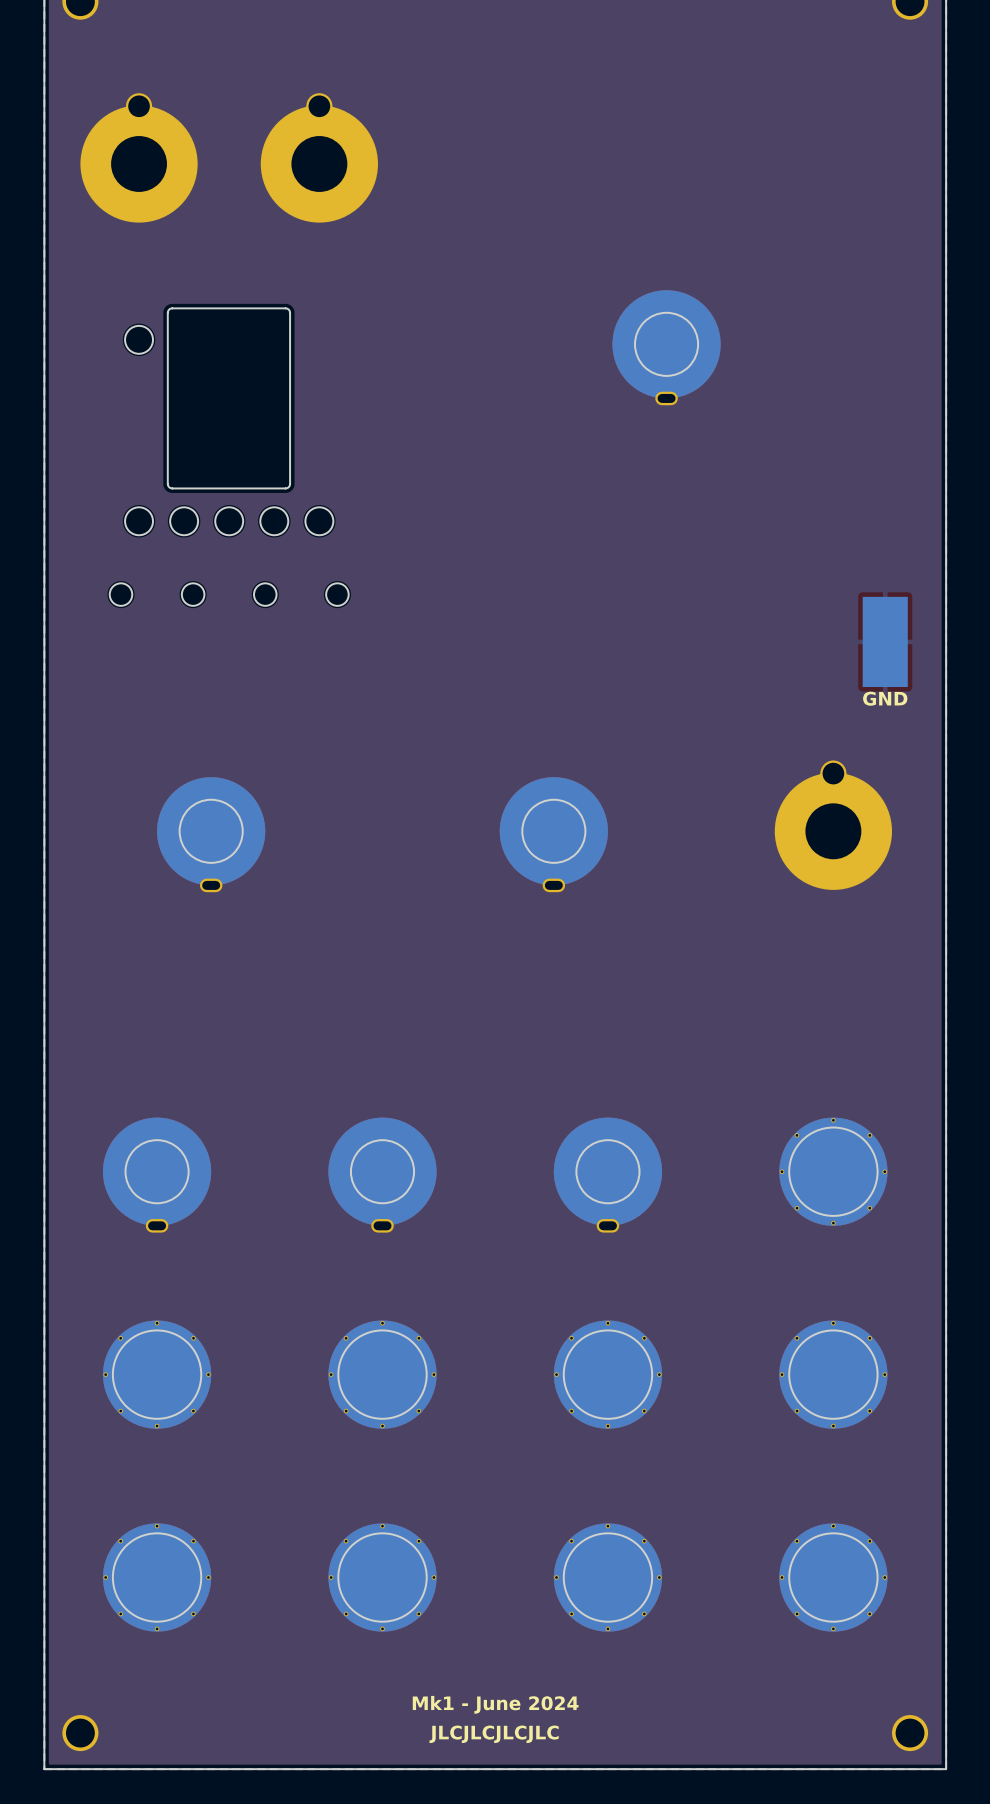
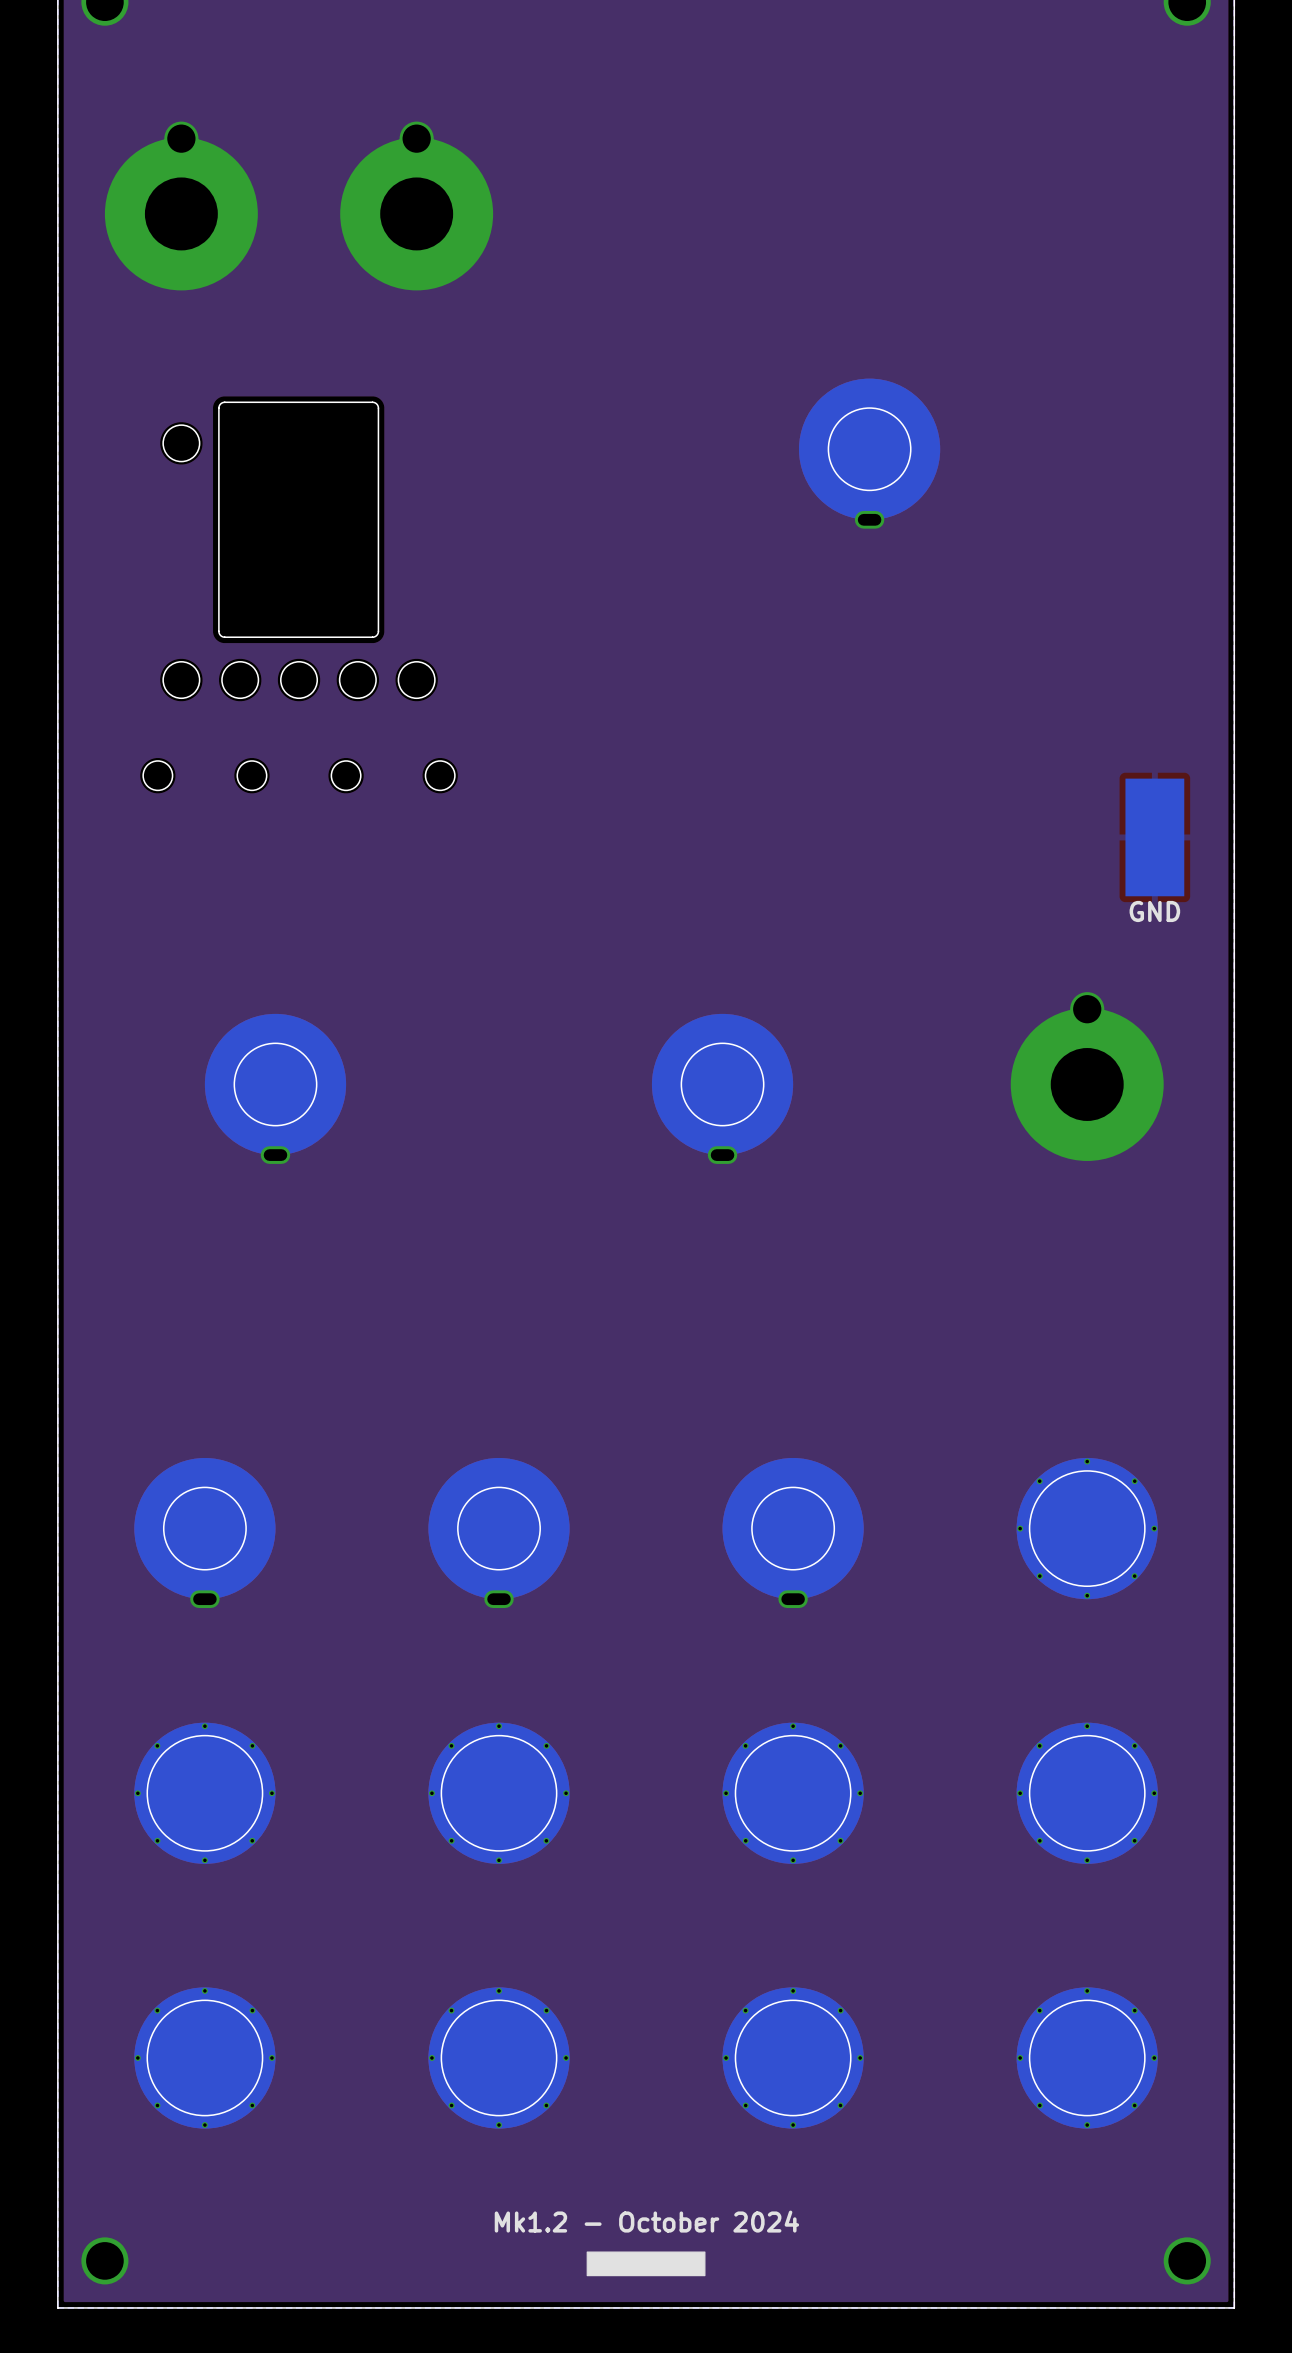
text: Mk1 - June 2024 (495, 1704) -> Mk1.2 - October 2024 (646, 2221)
drawing: none -> [586, 2251, 706, 2277]
text: JLCJLCJLCJLC (494, 1734) -> none

